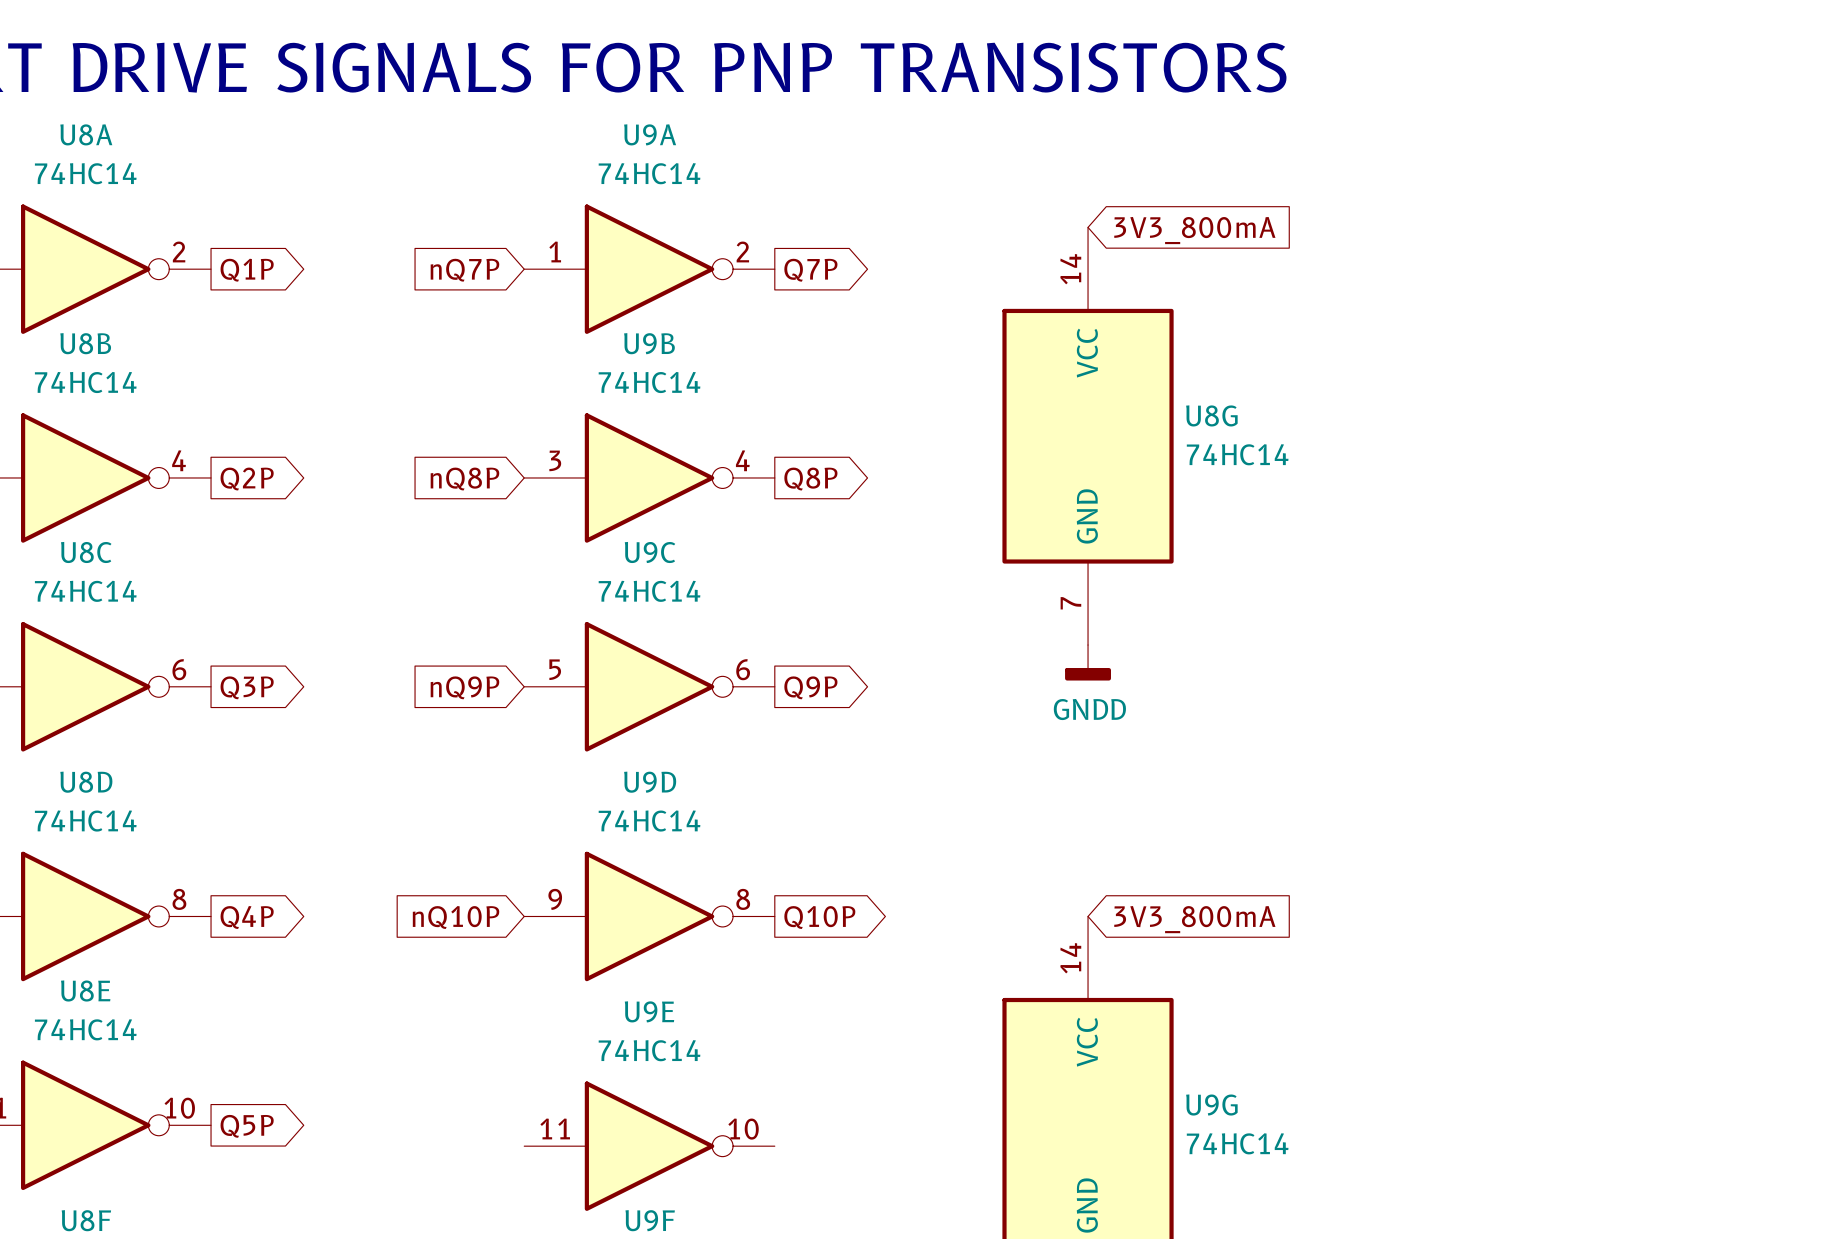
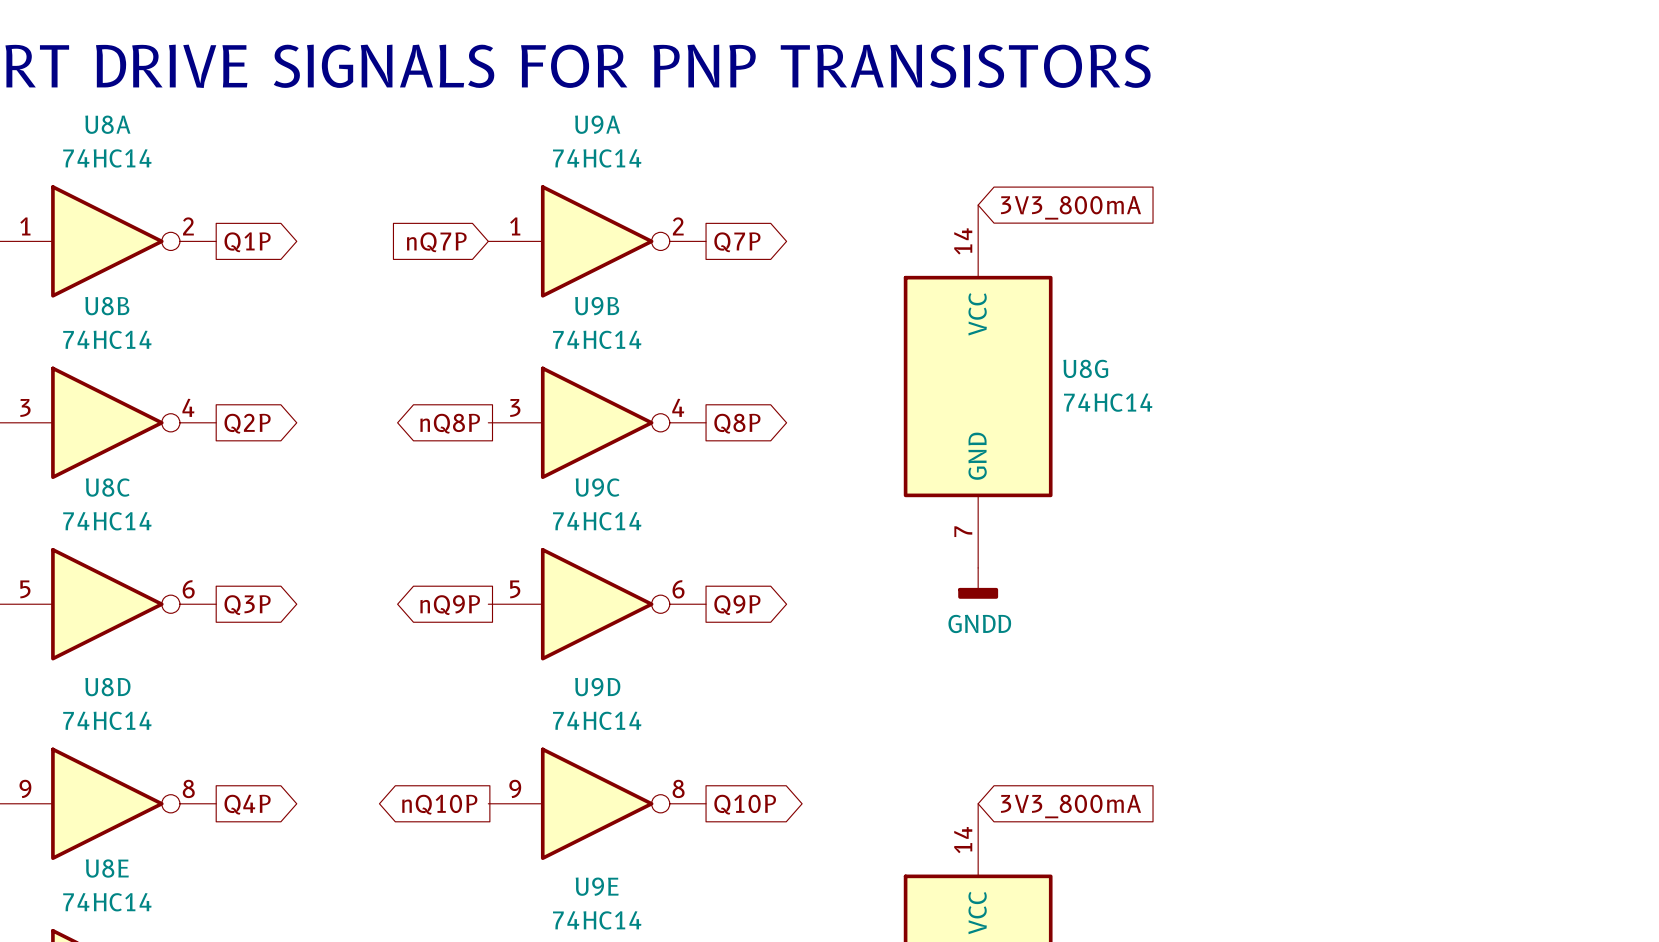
global label rotation: 0° (464, 479) -> 180° (450, 423)
global label rotation: 0° (464, 687) -> 180° (450, 605)
global label rotation: 0° (456, 917) -> 180° (439, 804)

